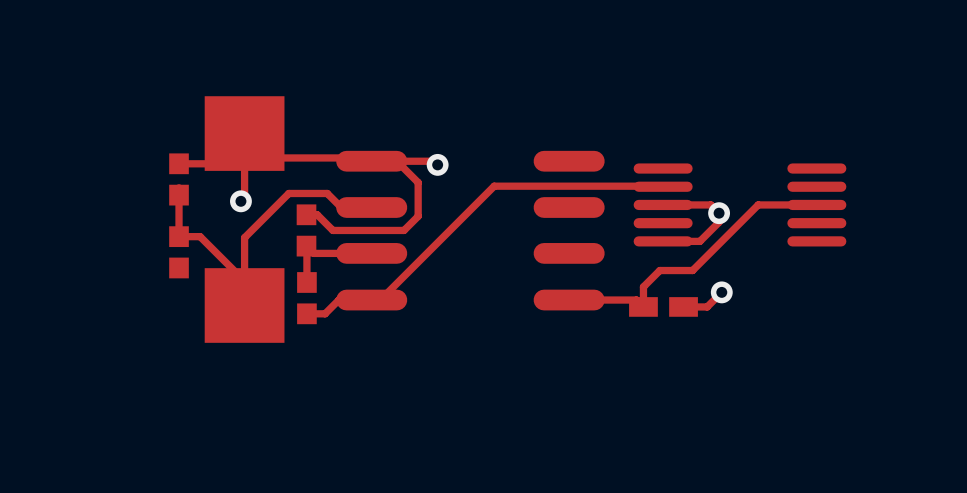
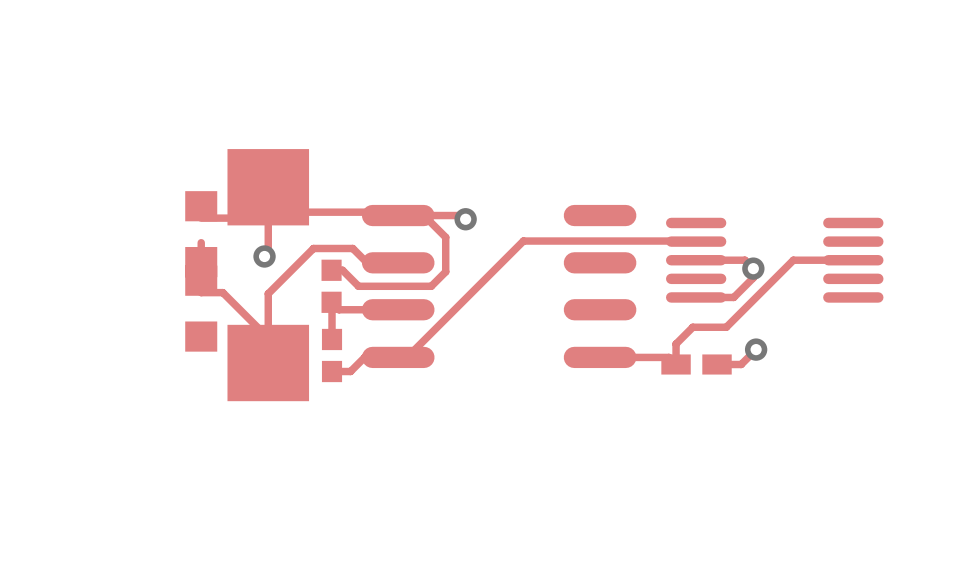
part footprint: [169, 153, 189, 206] -> [185, 191, 218, 278]
part footprint: [169, 226, 189, 279] -> [185, 265, 218, 352]

